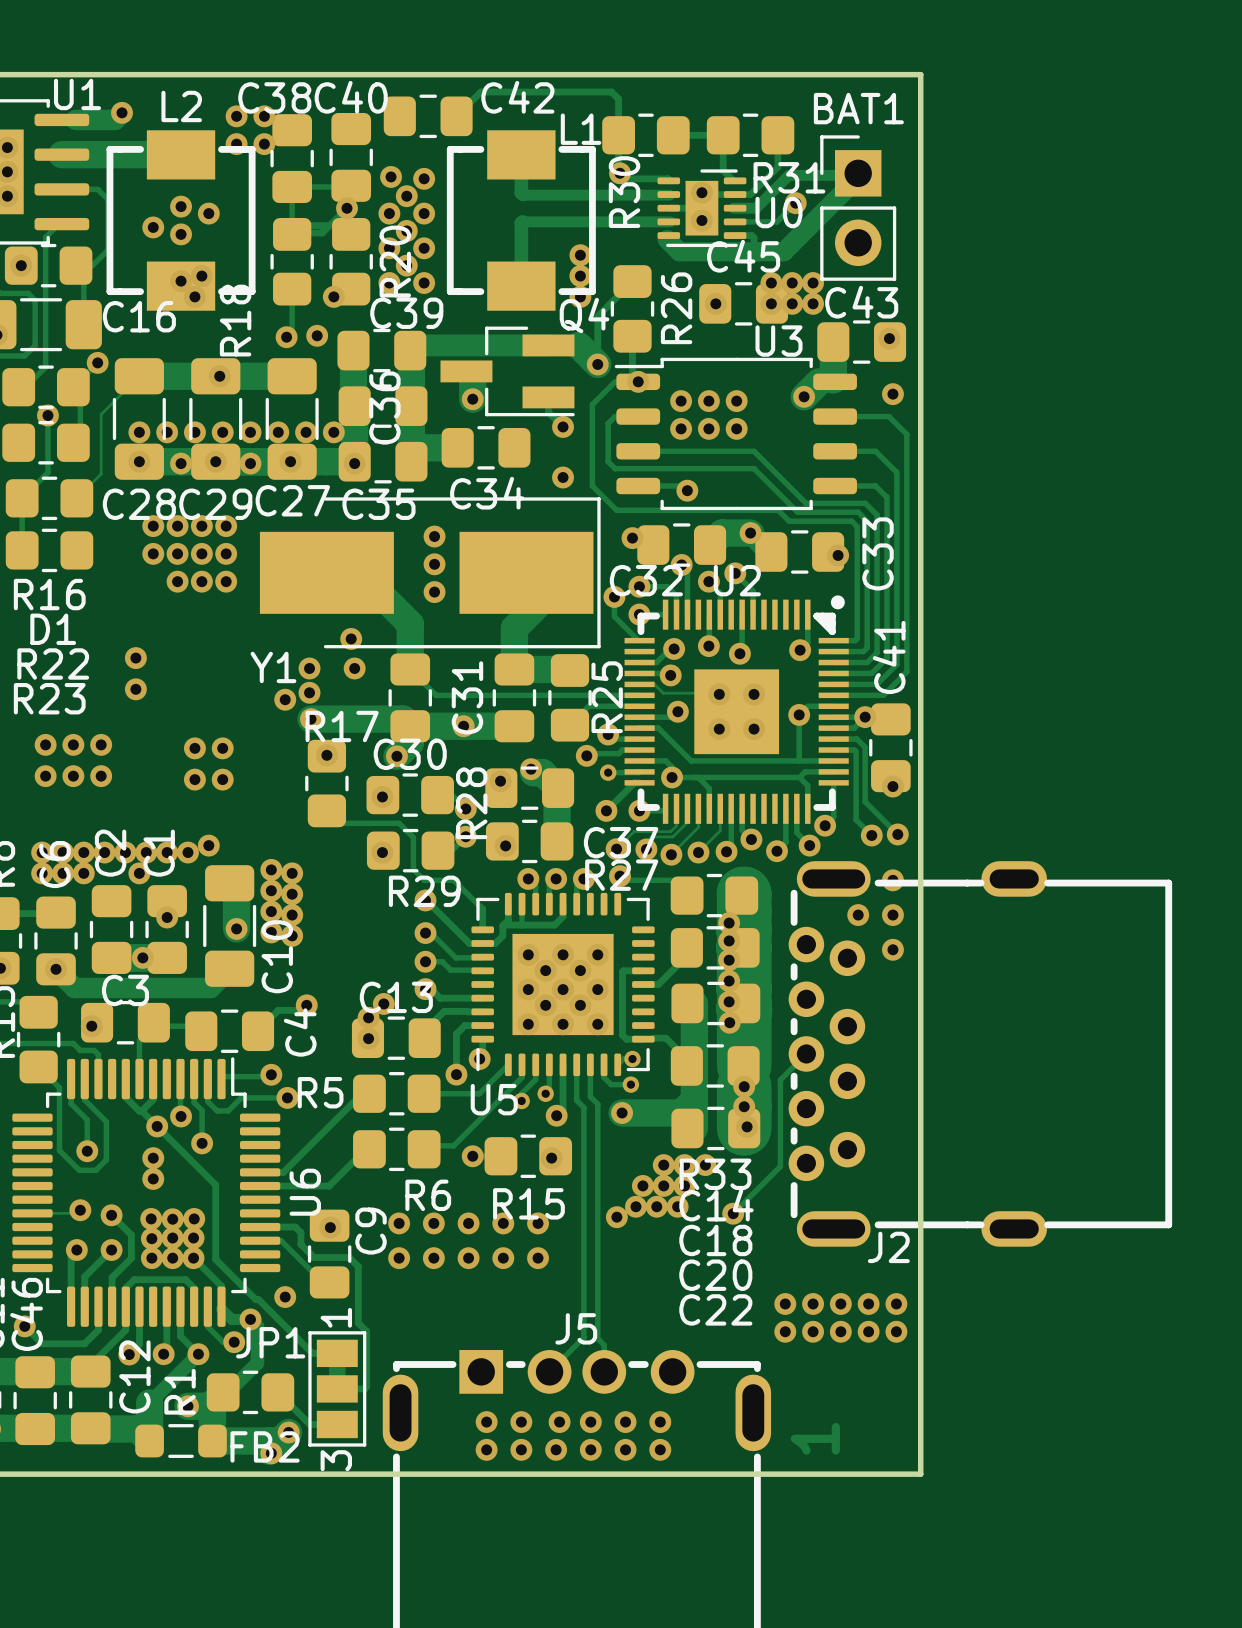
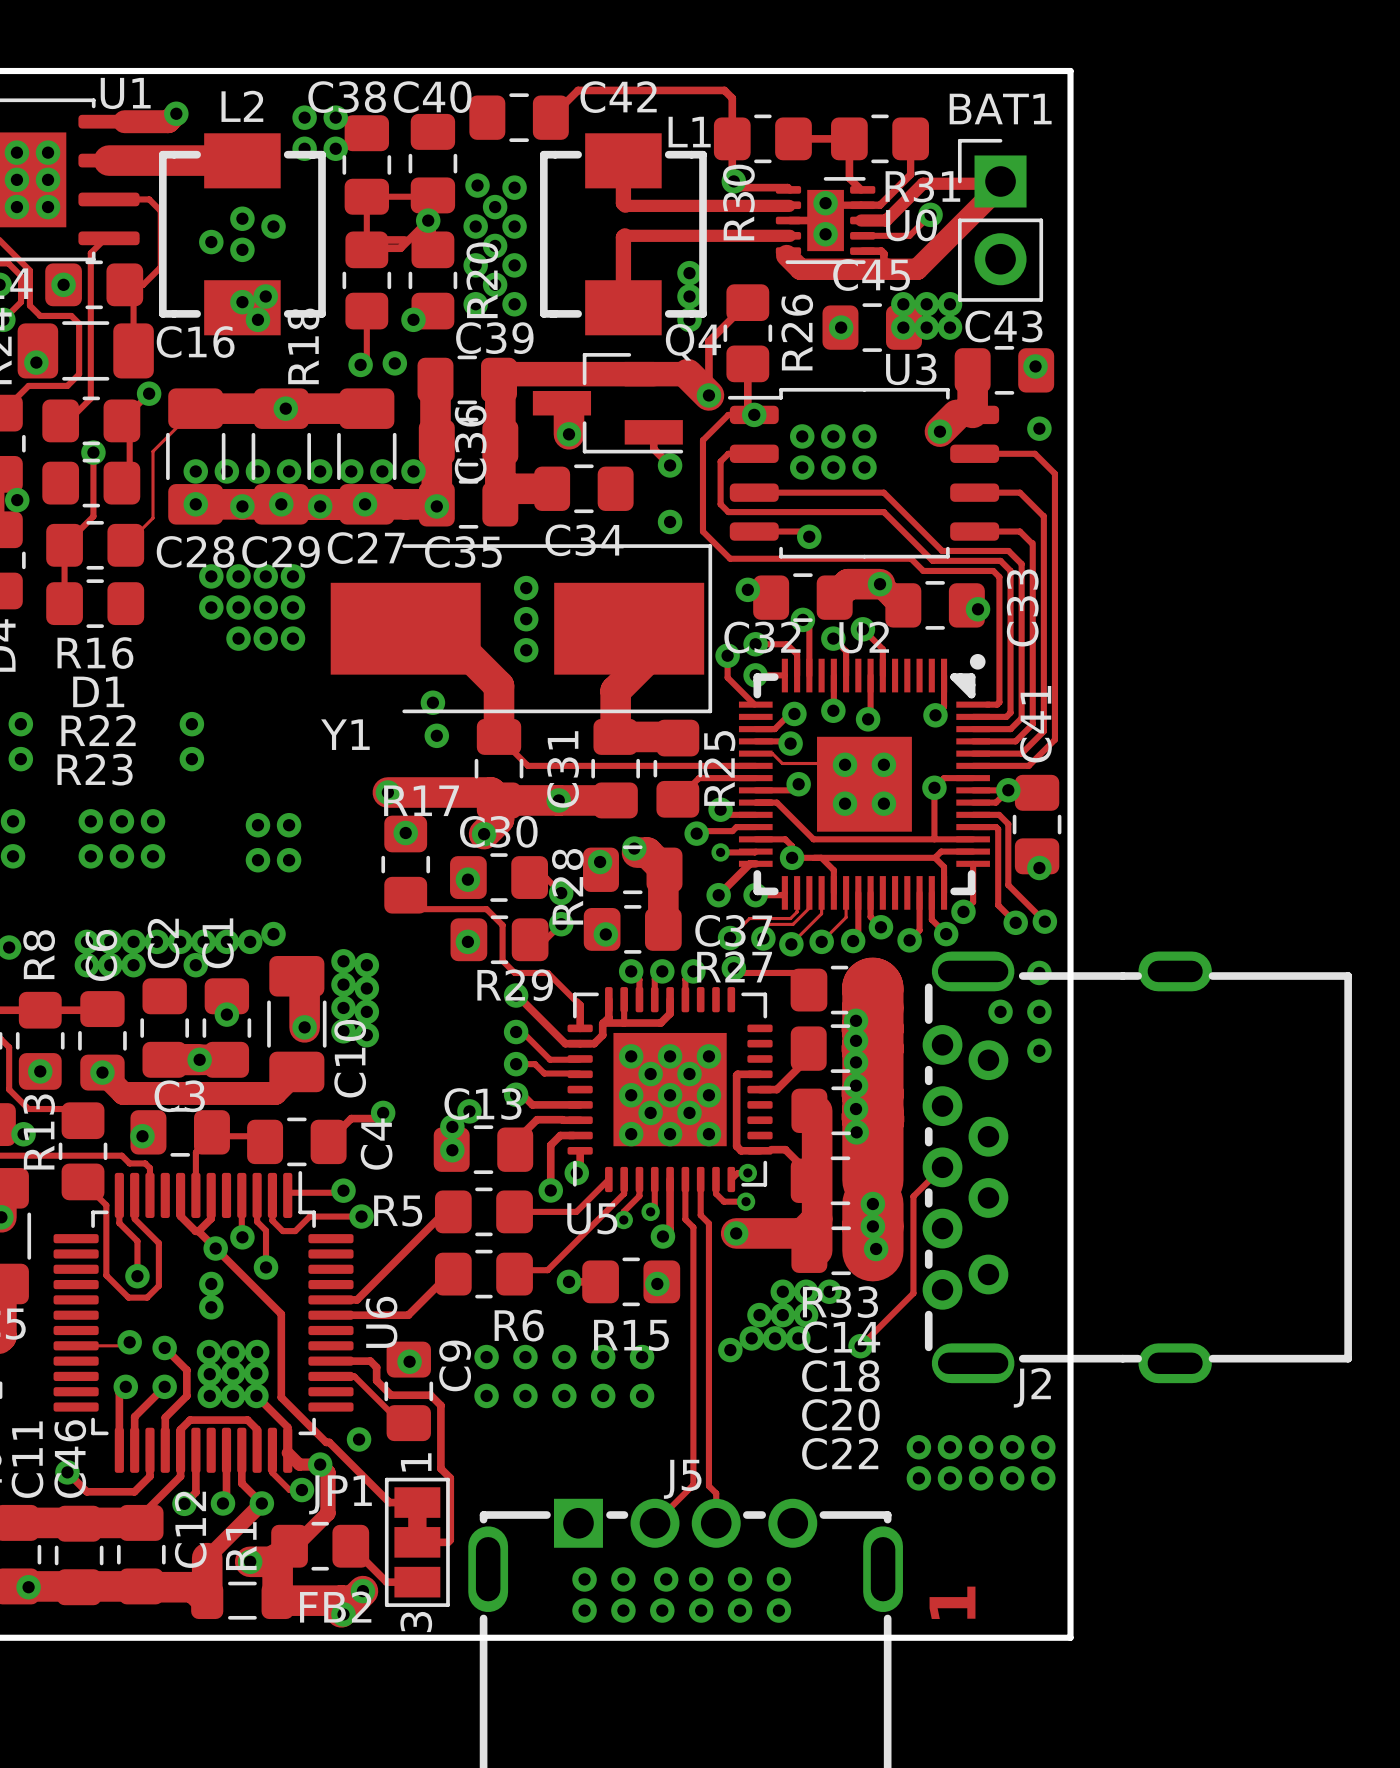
via: (309, 668) -> none
via: (309, 692) -> none
via: (285, 699) -> none

